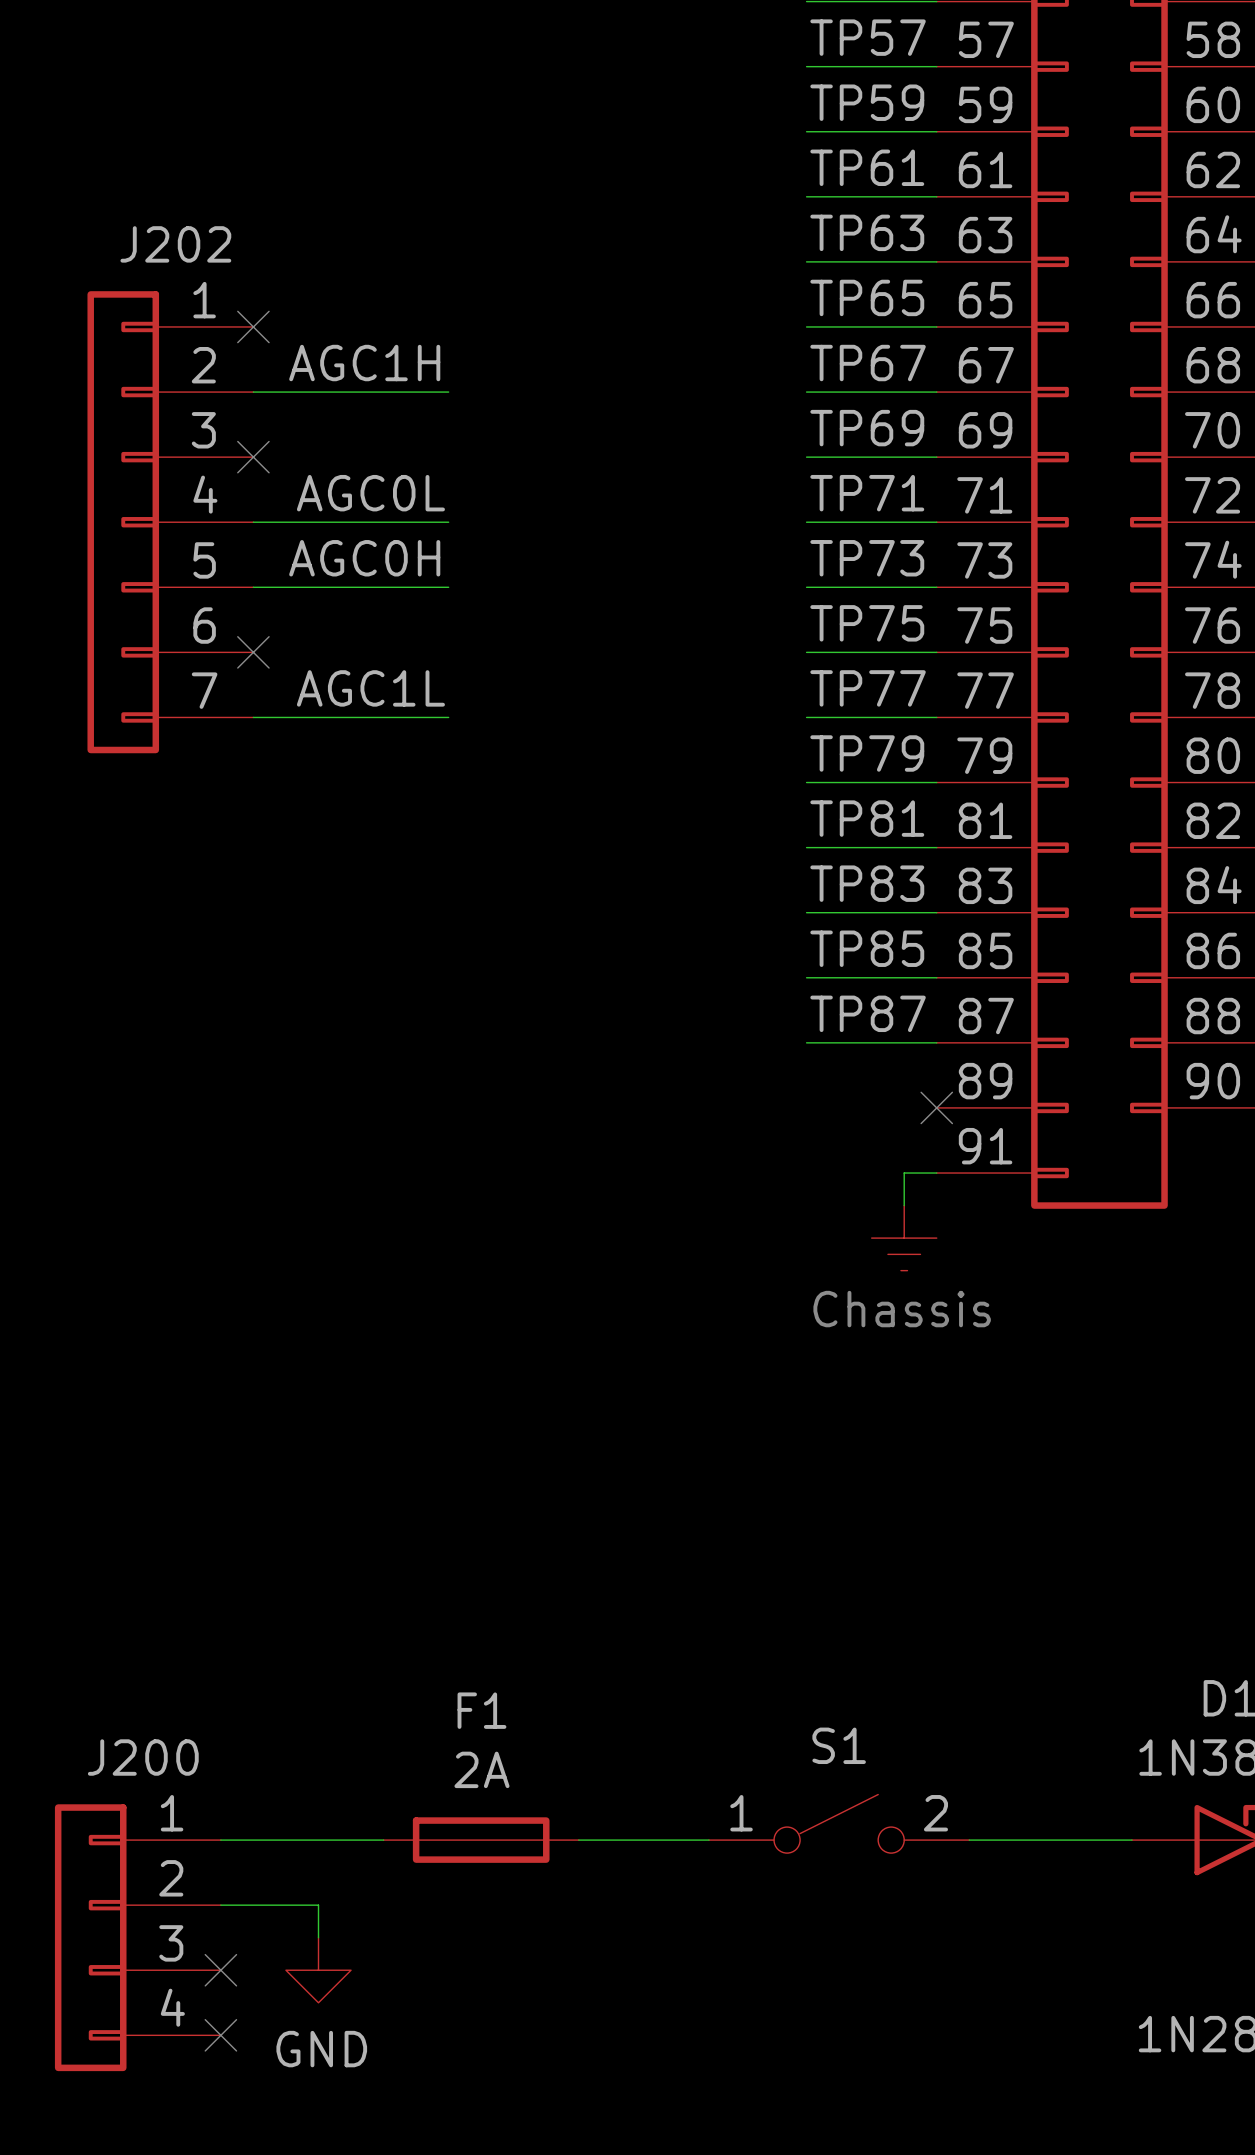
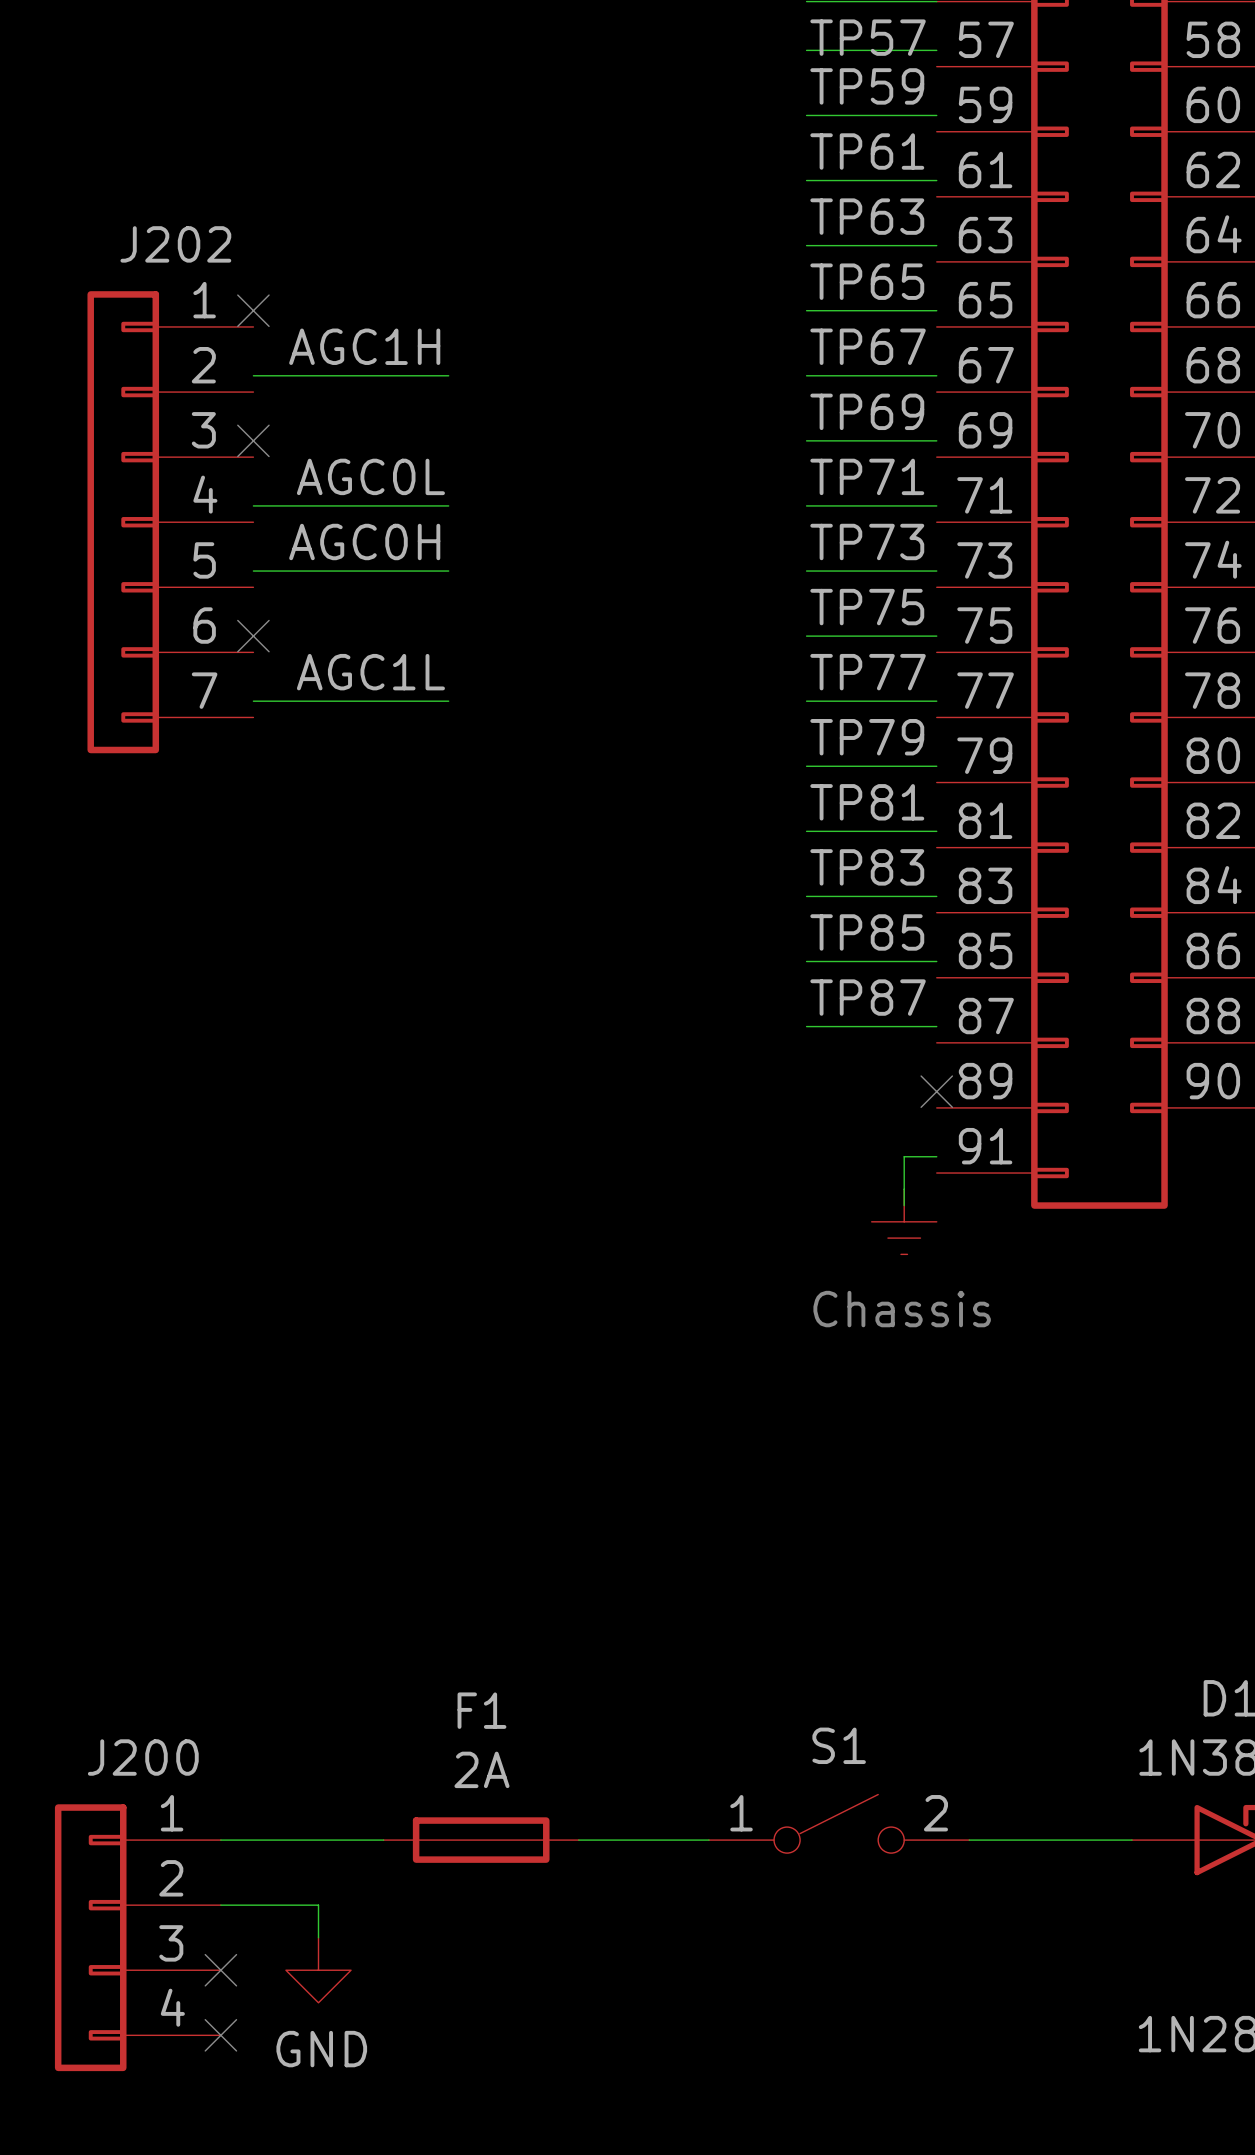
wire: (806, 66) (936, 66) -> (806, 50) (936, 50)
label position: TP59 (867, 102) -> TP59 (867, 86)
wire: (806, 131) (936, 131) -> (806, 115) (936, 115)
label position: TP61 (867, 167) -> TP61 (867, 151)
wire: (806, 196) (936, 196) -> (806, 180) (936, 180)
label position: TP63 (867, 232) -> TP63 (867, 216)
wire: (806, 261) (936, 261) -> (806, 245) (936, 245)
label position: TP65 (867, 297) -> TP65 (867, 281)
no-connect mark position: (253, 326) -> (253, 310)
wire: (806, 326) (936, 326) -> (806, 310) (936, 310)
label position: AGC1H (364, 363) -> AGC1H (364, 346)
label position: TP67 (868, 363) -> TP67 (868, 346)
wire: (253, 392) (448, 392) -> (253, 375) (448, 375)
wire: (806, 392) (936, 392) -> (806, 375) (936, 375)
label position: TP69 (867, 428) -> TP69 (867, 411)
no-connect mark position: (253, 457) -> (253, 440)
wire: (806, 457) (936, 457) -> (806, 440) (936, 440)
label position: AGC0L (370, 493) -> AGC0L (370, 476)
label position: TP71 (867, 493) -> TP71 (867, 476)
wire: (253, 522) (448, 522) -> (253, 505) (448, 505)
wire: (806, 522) (936, 522) -> (806, 505) (936, 505)
label position: AGC0H (364, 558) -> AGC0H (364, 541)
label position: TP73 (867, 558) -> TP73 (867, 541)
wire: (253, 587) (448, 587) -> (253, 571) (448, 571)
wire: (806, 587) (936, 587) -> (806, 571) (936, 571)
label position: TP75 (867, 623) -> TP75 (867, 607)
no-connect mark position: (253, 652) -> (253, 636)
wire: (806, 652) (936, 652) -> (806, 636) (936, 636)
label position: AGC1L (370, 688) -> AGC1L (370, 672)
label position: TP77 (868, 688) -> TP77 (868, 672)
wire: (253, 717) (448, 717) -> (253, 701) (448, 701)
wire: (806, 717) (936, 717) -> (806, 701) (936, 701)
label position: TP79 (867, 753) -> TP79 (867, 737)
wire: (806, 782) (936, 782) -> (806, 766) (936, 766)
label position: TP81 (867, 818) -> TP81 (867, 802)
wire: (806, 847) (936, 847) -> (806, 831) (936, 831)
label position: TP83 (867, 883) -> TP83 (867, 867)
wire: (806, 912) (936, 912) -> (806, 896) (936, 896)
label position: TP85 (867, 948) -> TP85 (867, 932)
wire: (806, 977) (936, 977) -> (806, 961) (936, 961)
label position: TP87 (868, 1013) -> TP87 (868, 997)
wire: (806, 1042) (936, 1042) -> (806, 1026) (936, 1026)
no-connect mark position: (936, 1107) -> (936, 1091)
wire: (904, 1173) (936, 1173) -> (904, 1173) (904, 1156) (936, 1156)
power symbol position: (904, 1238) -> (904, 1221)

